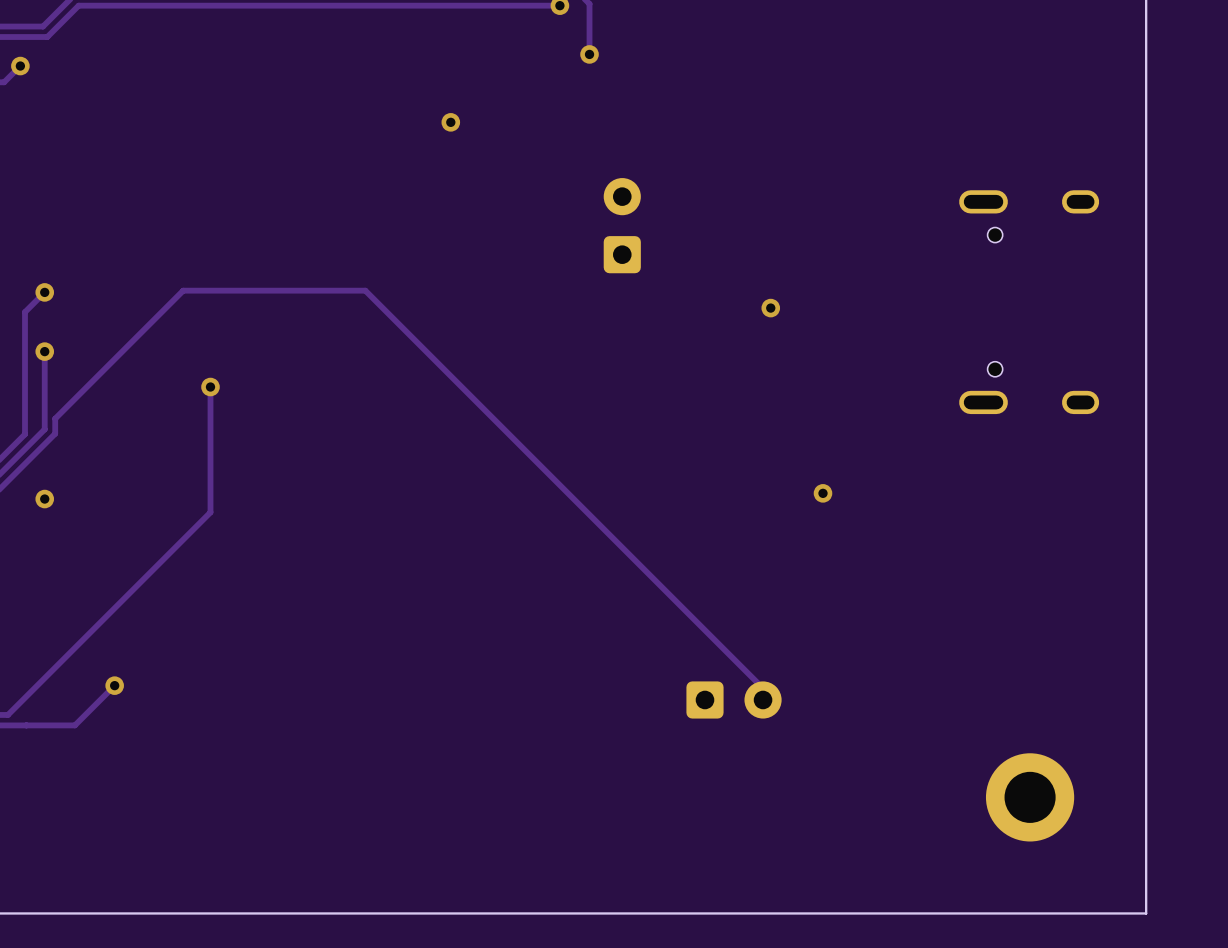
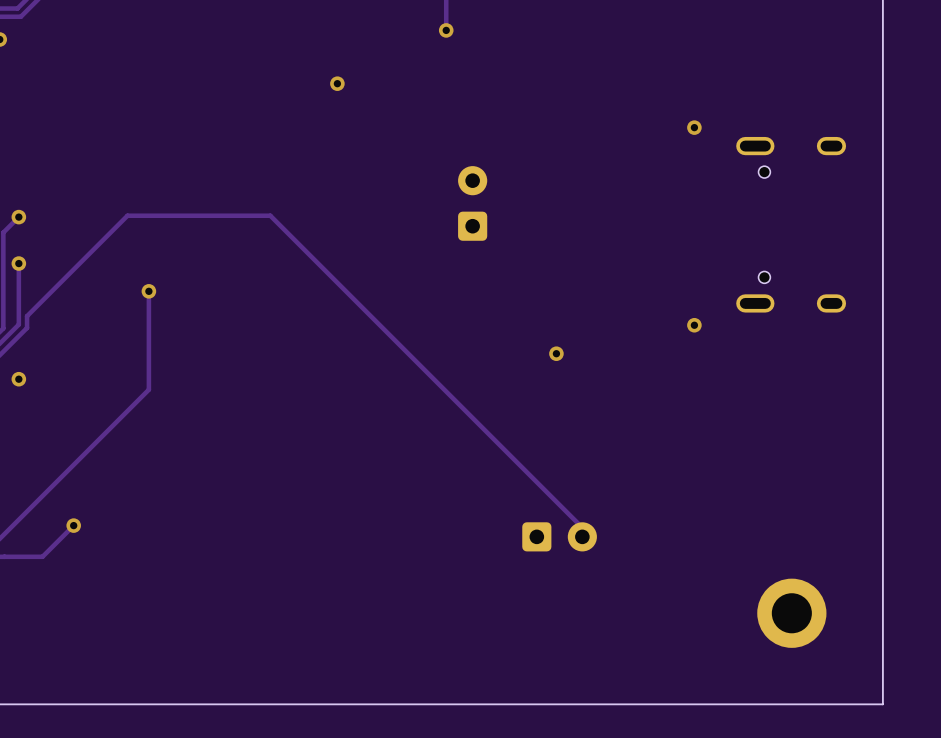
via: none -> (694, 127)
part position: (622, 225) -> (472, 203)
via: (770, 308) -> none
via: none -> (694, 325)
via: none -> (556, 353)
via: (823, 493) -> none

